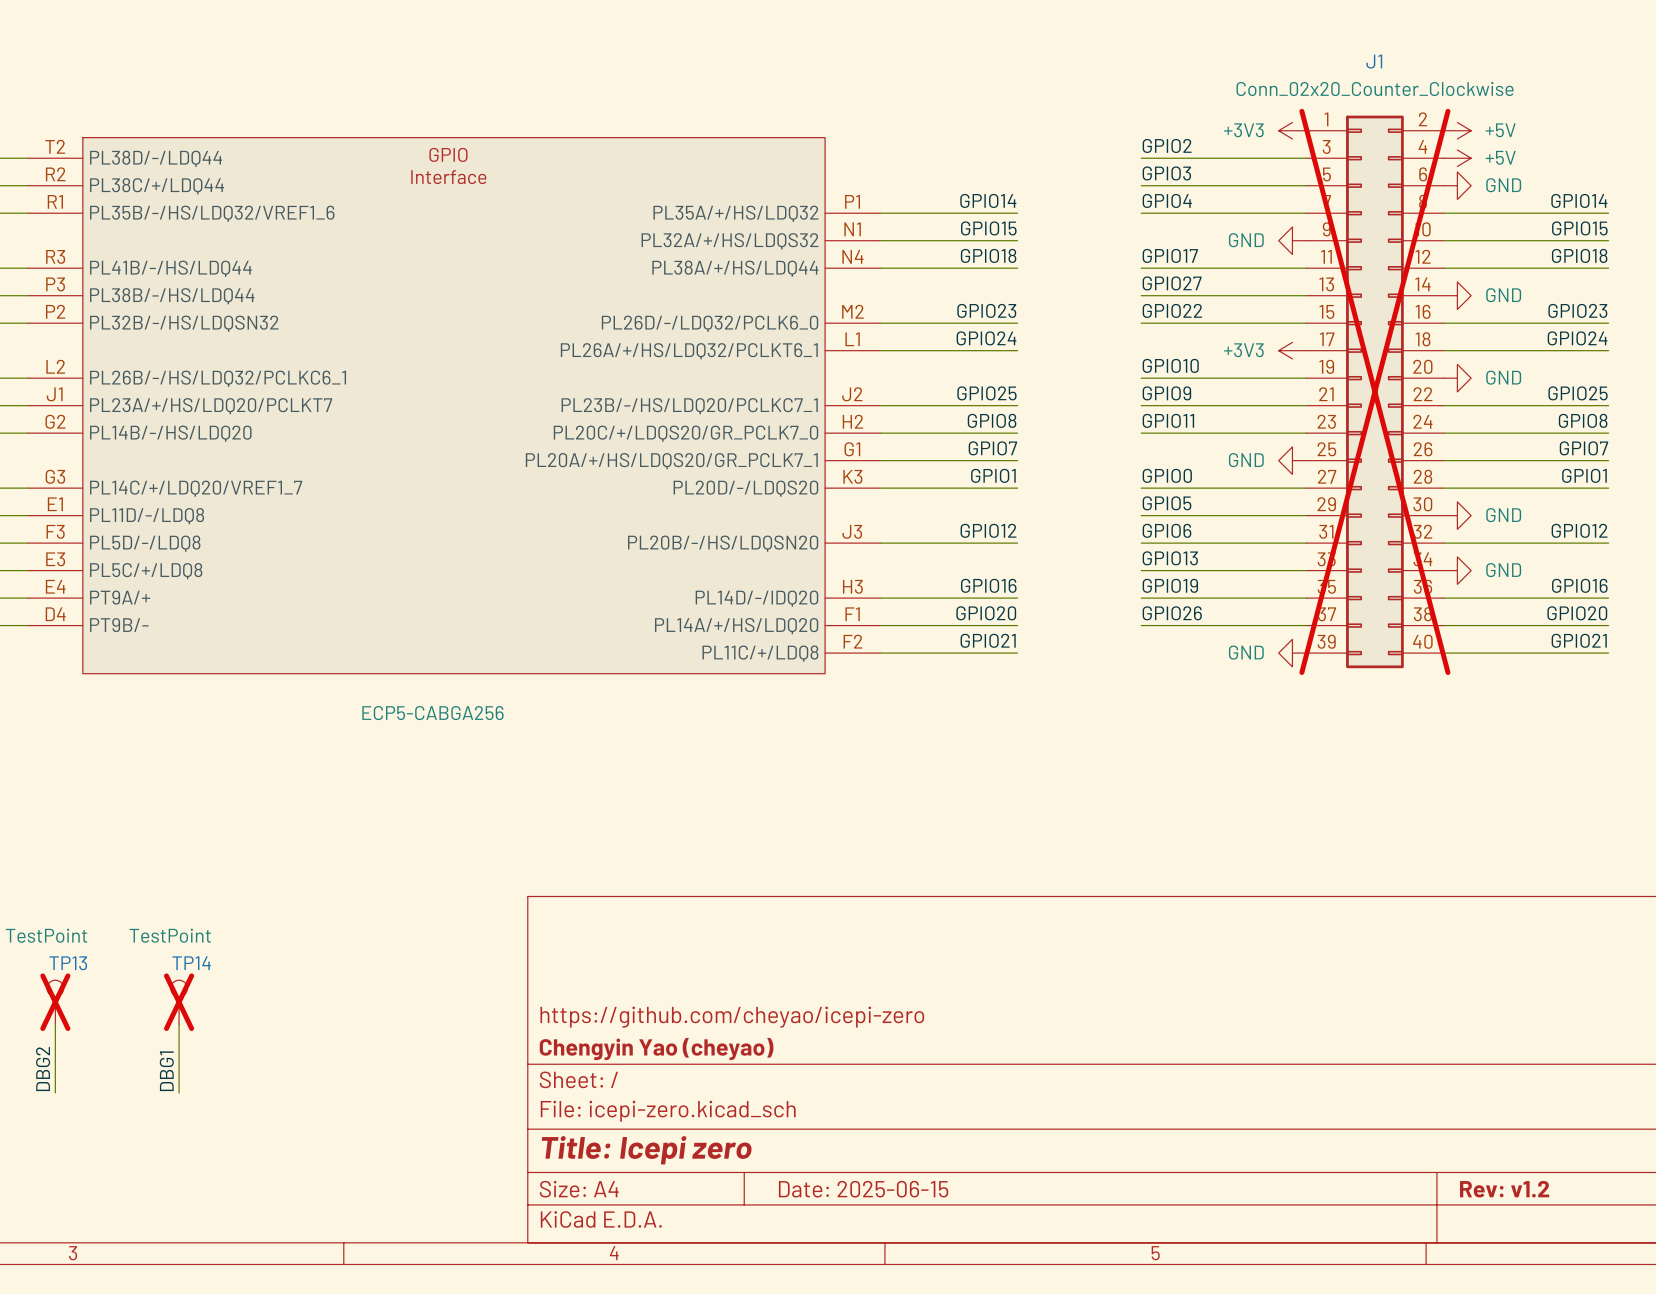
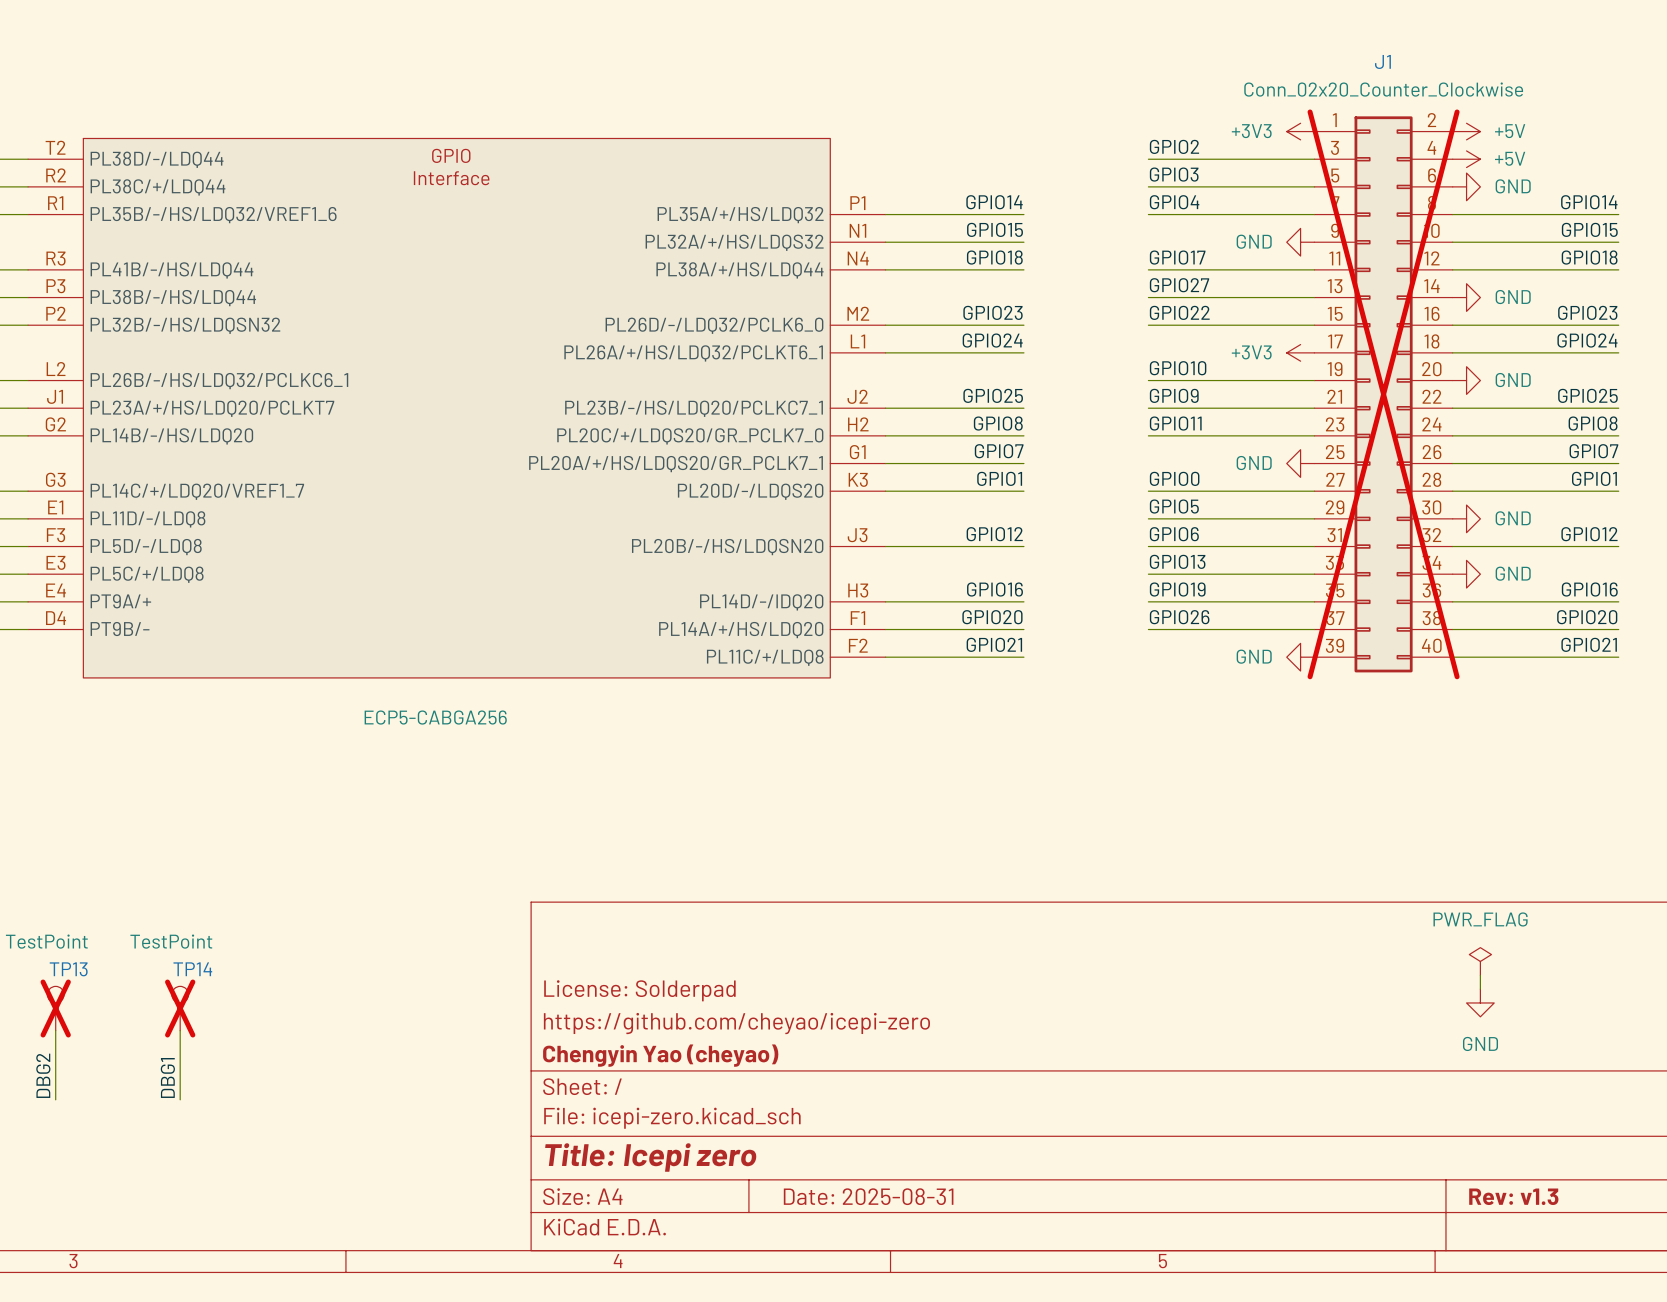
power symbol: none -> PWR_FLAG (1480, 961)
wire: none -> (1480, 975) (1480, 989)
title block: none -> License: Solderpad (639, 990)
power symbol: none -> GND (1480, 1002)
title block: Date: 2025-06-15 (863, 1189) -> Date: 2025-08-31 (868, 1196)
title block: Rev: v1.2 (1504, 1189) -> Rev: v1.3 (1513, 1196)

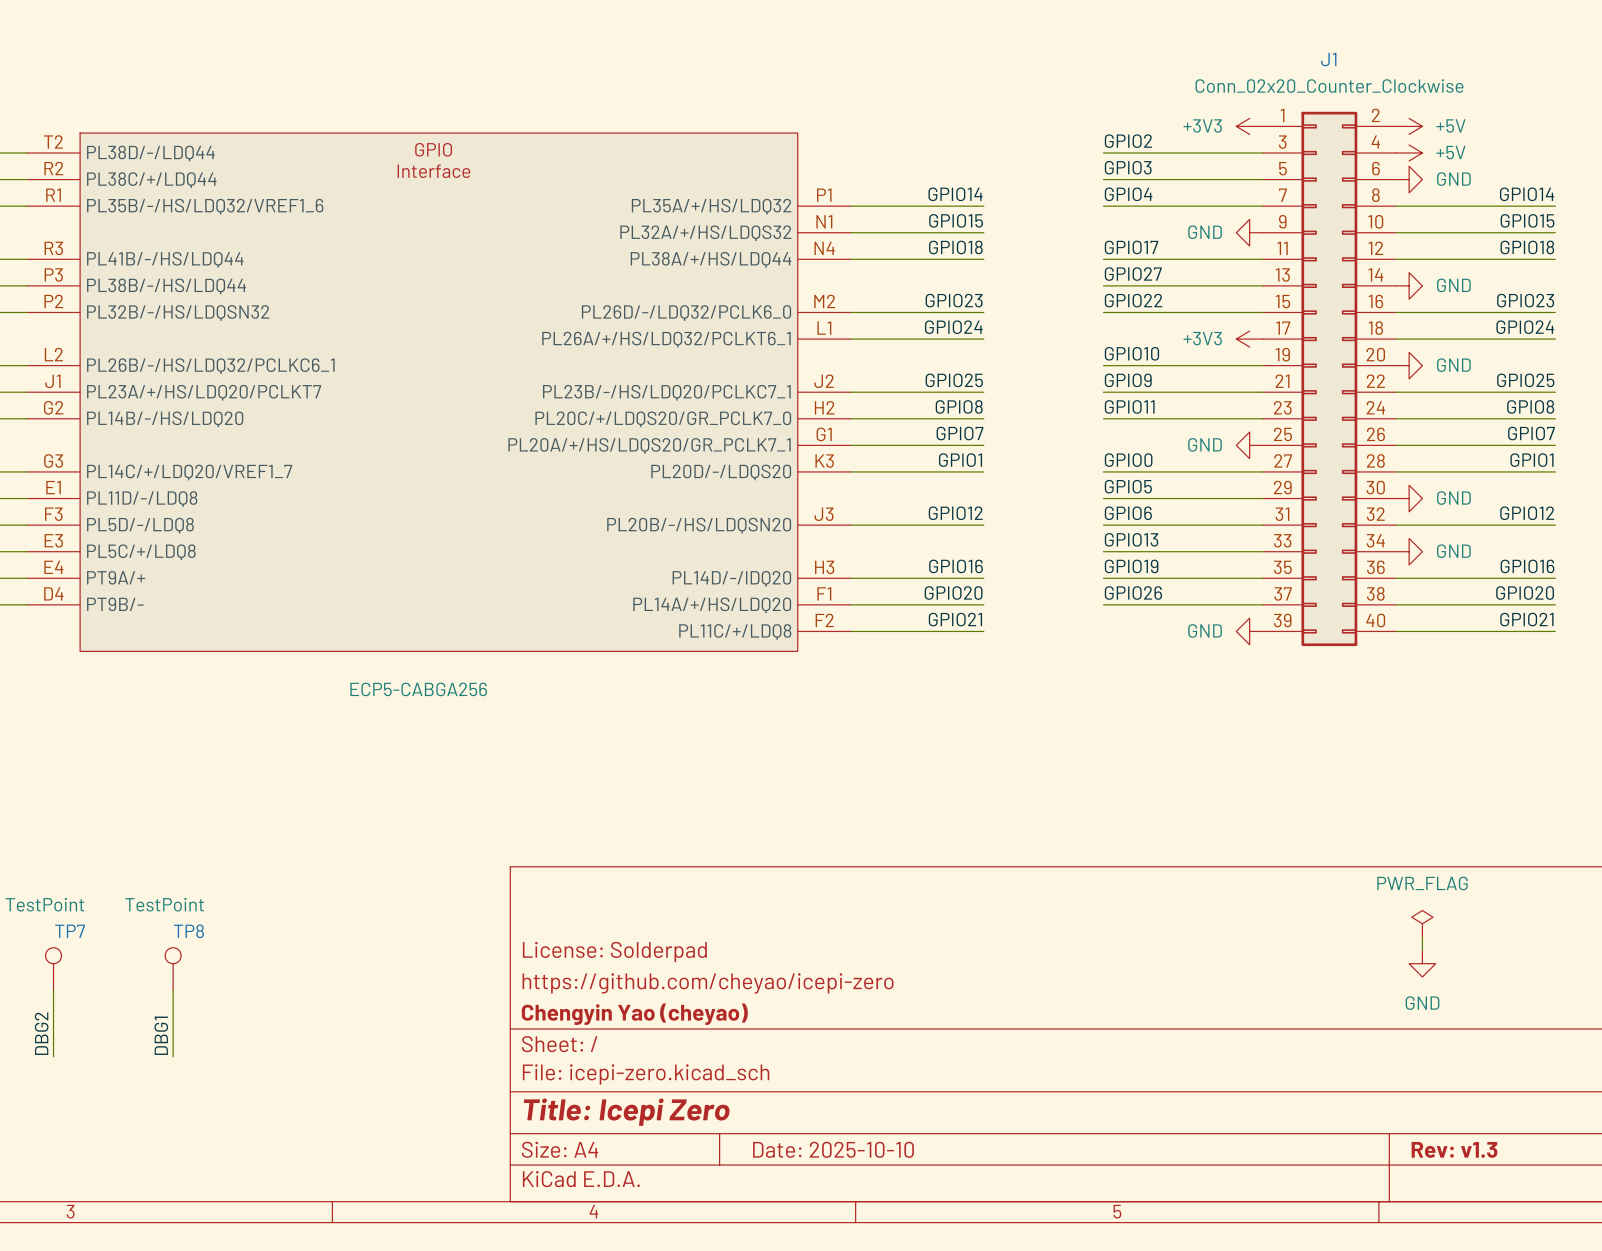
J1 do-not-place cross: (1383, 394) -> none
TP13 name: TP13 (68, 969) -> TP7 (70, 931)
TP14 name: TP14 (192, 969) -> TP8 (188, 931)
TP13 do-not-place cross: (55, 1008) -> none
TP14 do-not-place cross: (180, 1008) -> none
title block: Title: Icepi zero (650, 1157) -> Title: Icepi Zero (626, 1112)
title block: Date: 2025-08-31 (868, 1196) -> Date: 2025-10-10 (833, 1149)

